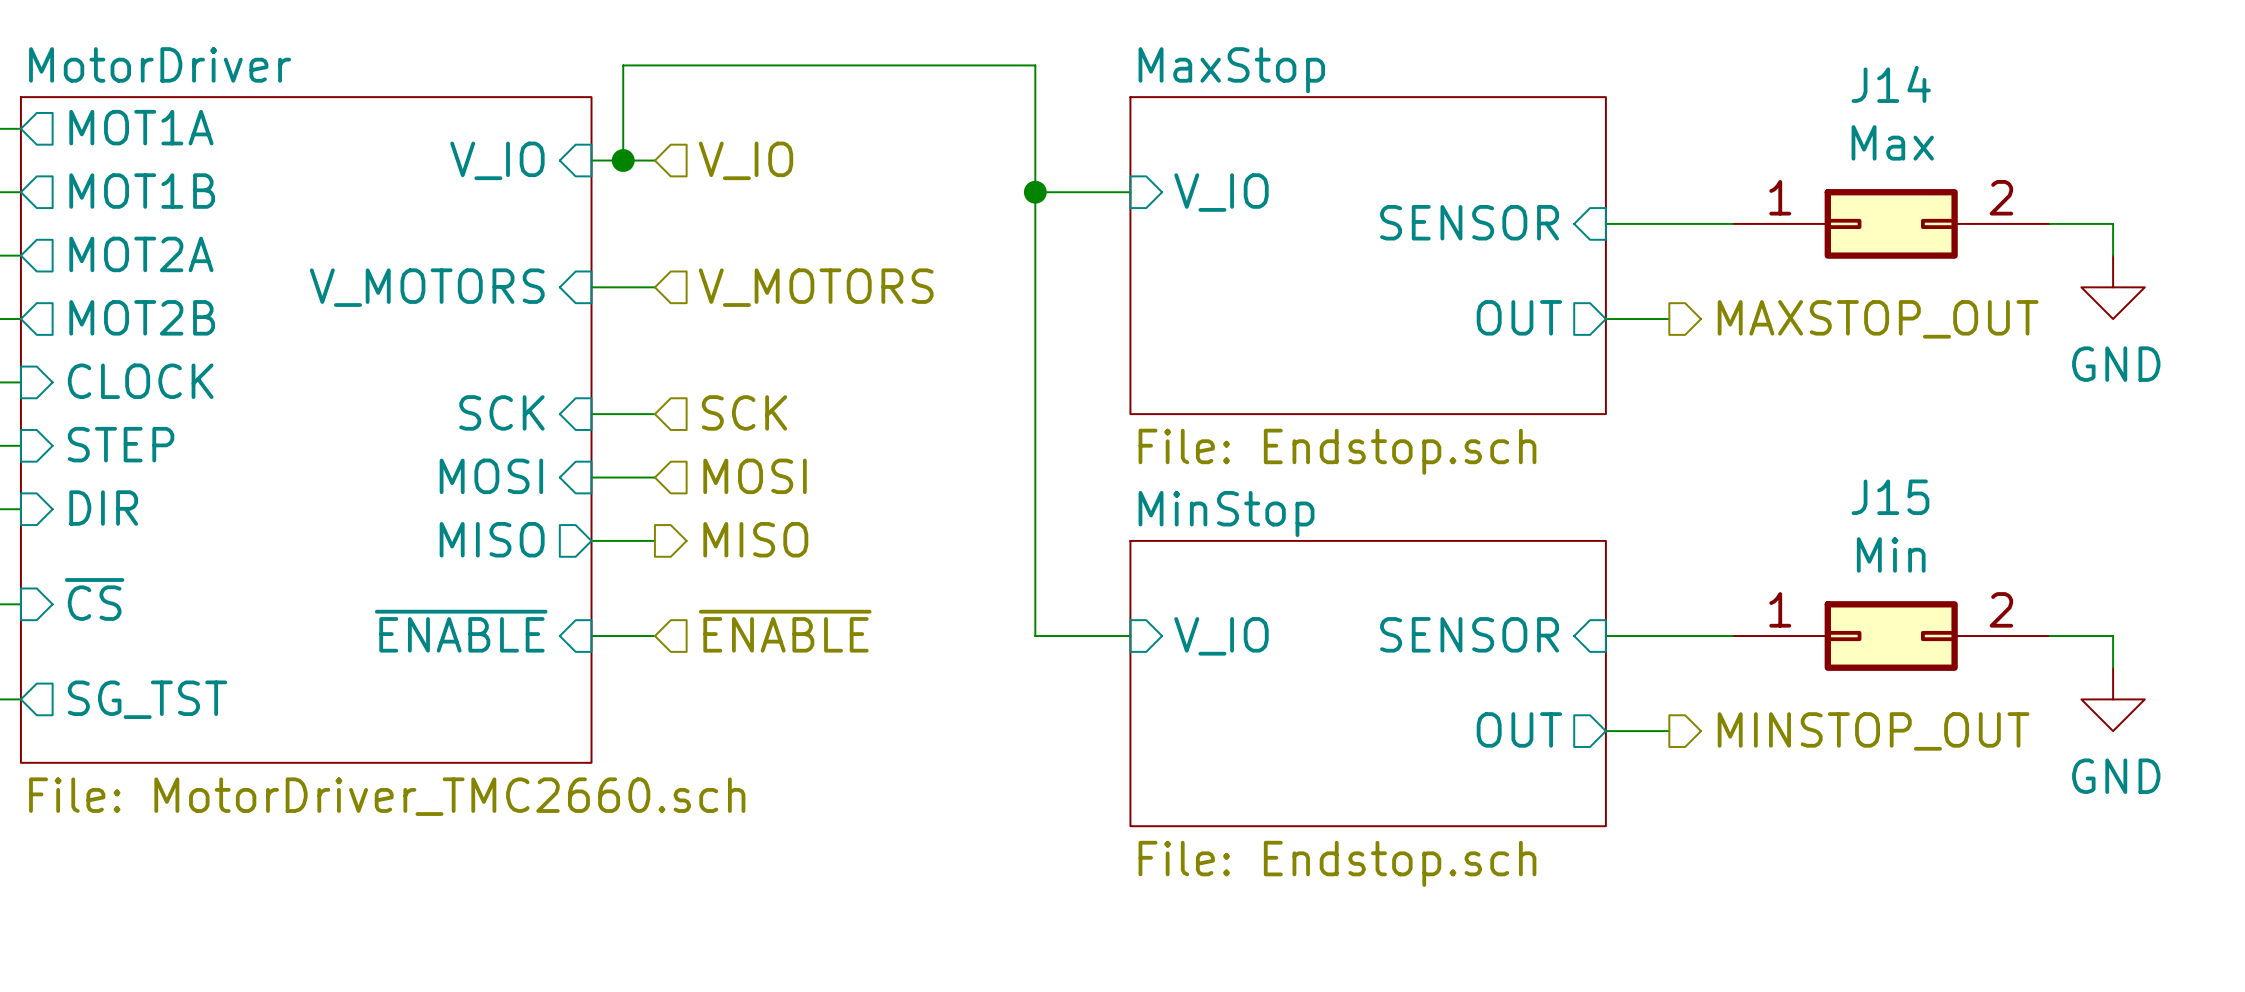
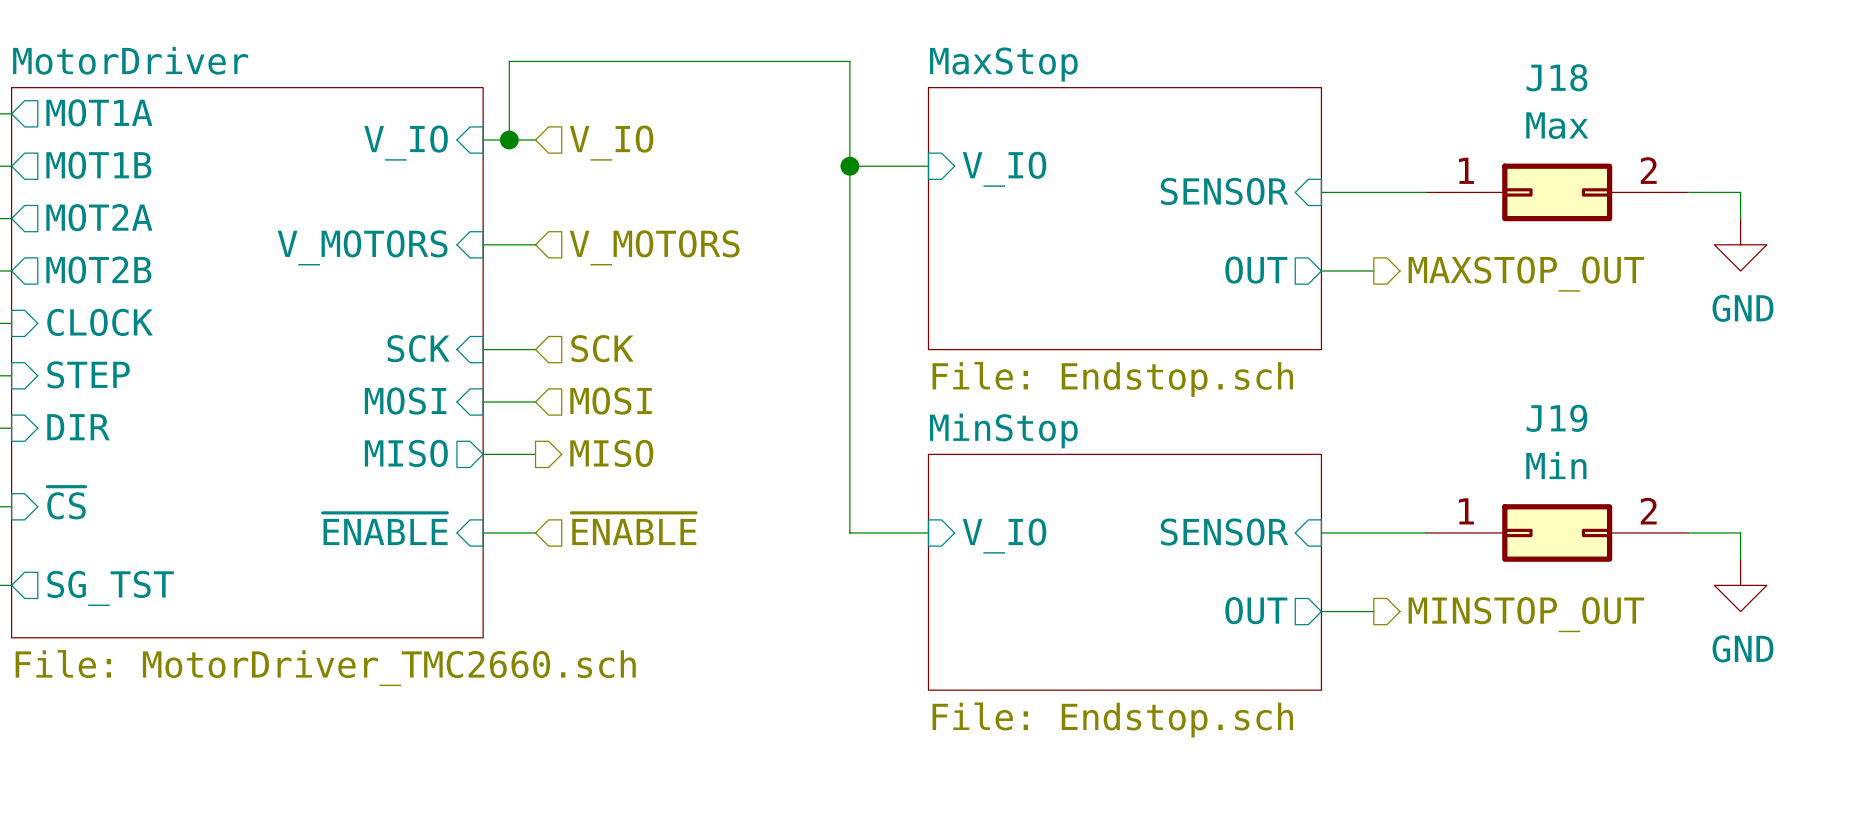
J14 name: J14 (1891, 84) -> J18 (1557, 77)
J15 name: J15 (1890, 497) -> J19 (1556, 418)

